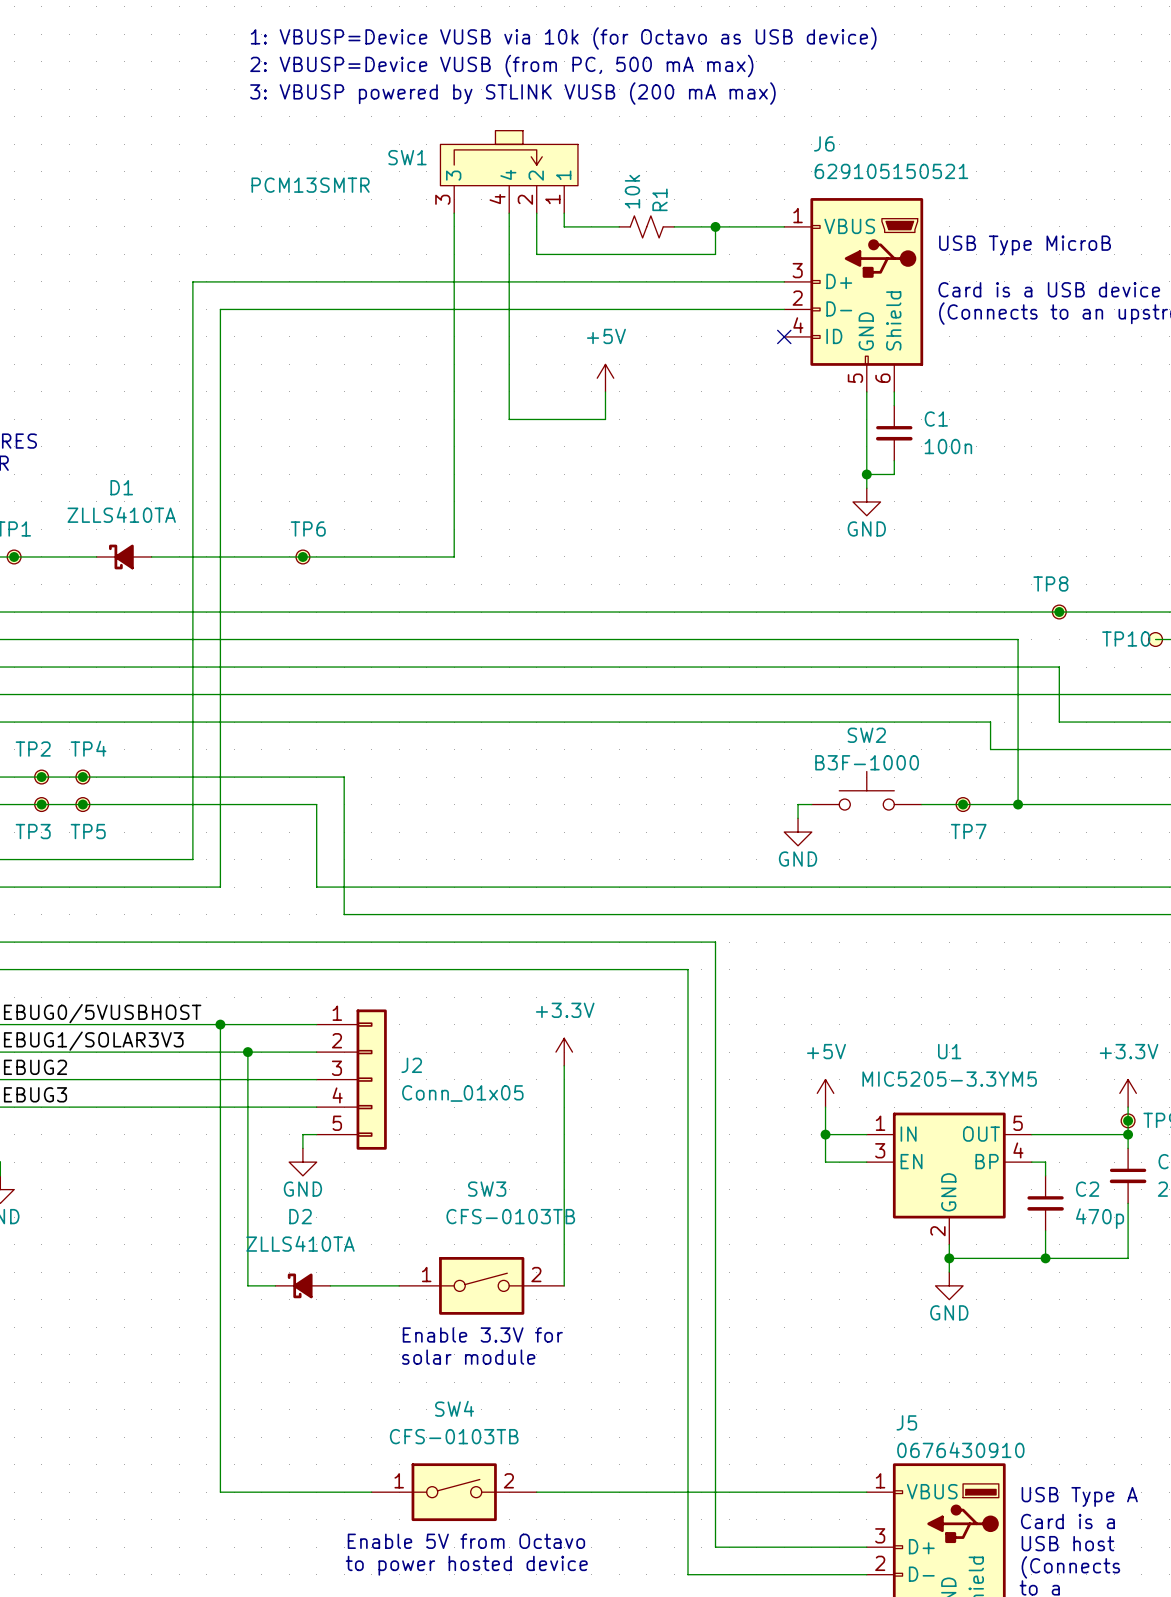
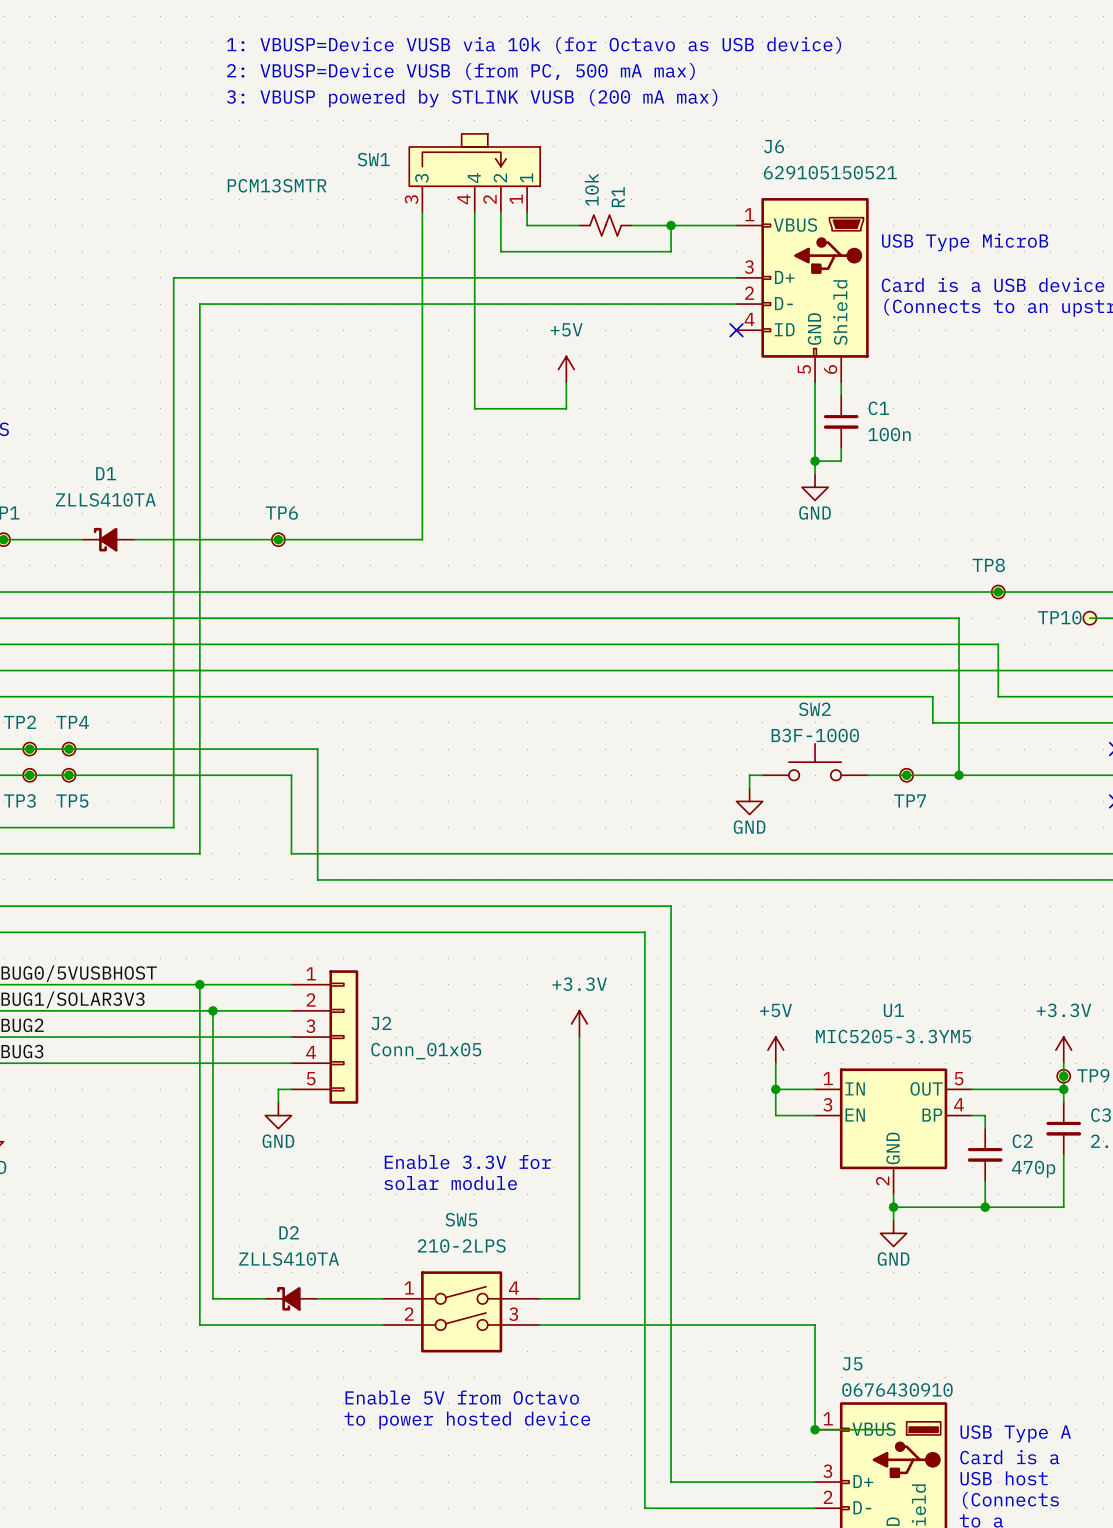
wire: none -> (212, 1010) (212, 1298) (265, 1298)
wire: (247, 1052) (247, 1285) (275, 1285) -> none
junction position: (247, 1052) -> (212, 1010)
power symbol position: +3.3V (564, 1052) -> +3.3V (579, 1023)
wire: (564, 1065) (564, 1285) -> none
wire: none -> (579, 1037) (579, 1298) (540, 1298)
D2 position: (302, 1285) -> (291, 1298)
wire: (330, 1285) (399, 1285) -> (317, 1298) (383, 1298)
SW3: CFS-0103TB (481, 1285) -> none
text position: Enable 3.3V for (482, 1334) -> Enable 3.3V for (467, 1162)
text position: solar module (468, 1357) -> solar module (450, 1183)
SW5: none -> 210-2LPS (461, 1311)
wire: (220, 1382) (220, 1492) (371, 1492) -> (199, 1324) (383, 1324)
wire: none -> (540, 1324) (815, 1324) (815, 1429) (893, 1429)
SW4: CFS-0103TB (454, 1492) -> none
wire: (536, 1492) (866, 1492) -> none
junction: none -> (815, 1429)
text position: Enable 5V from Octavo (466, 1541) -> Enable 5V from Octavo (462, 1397)
text position: to power hosted device (466, 1565) -> to power hosted device (467, 1420)

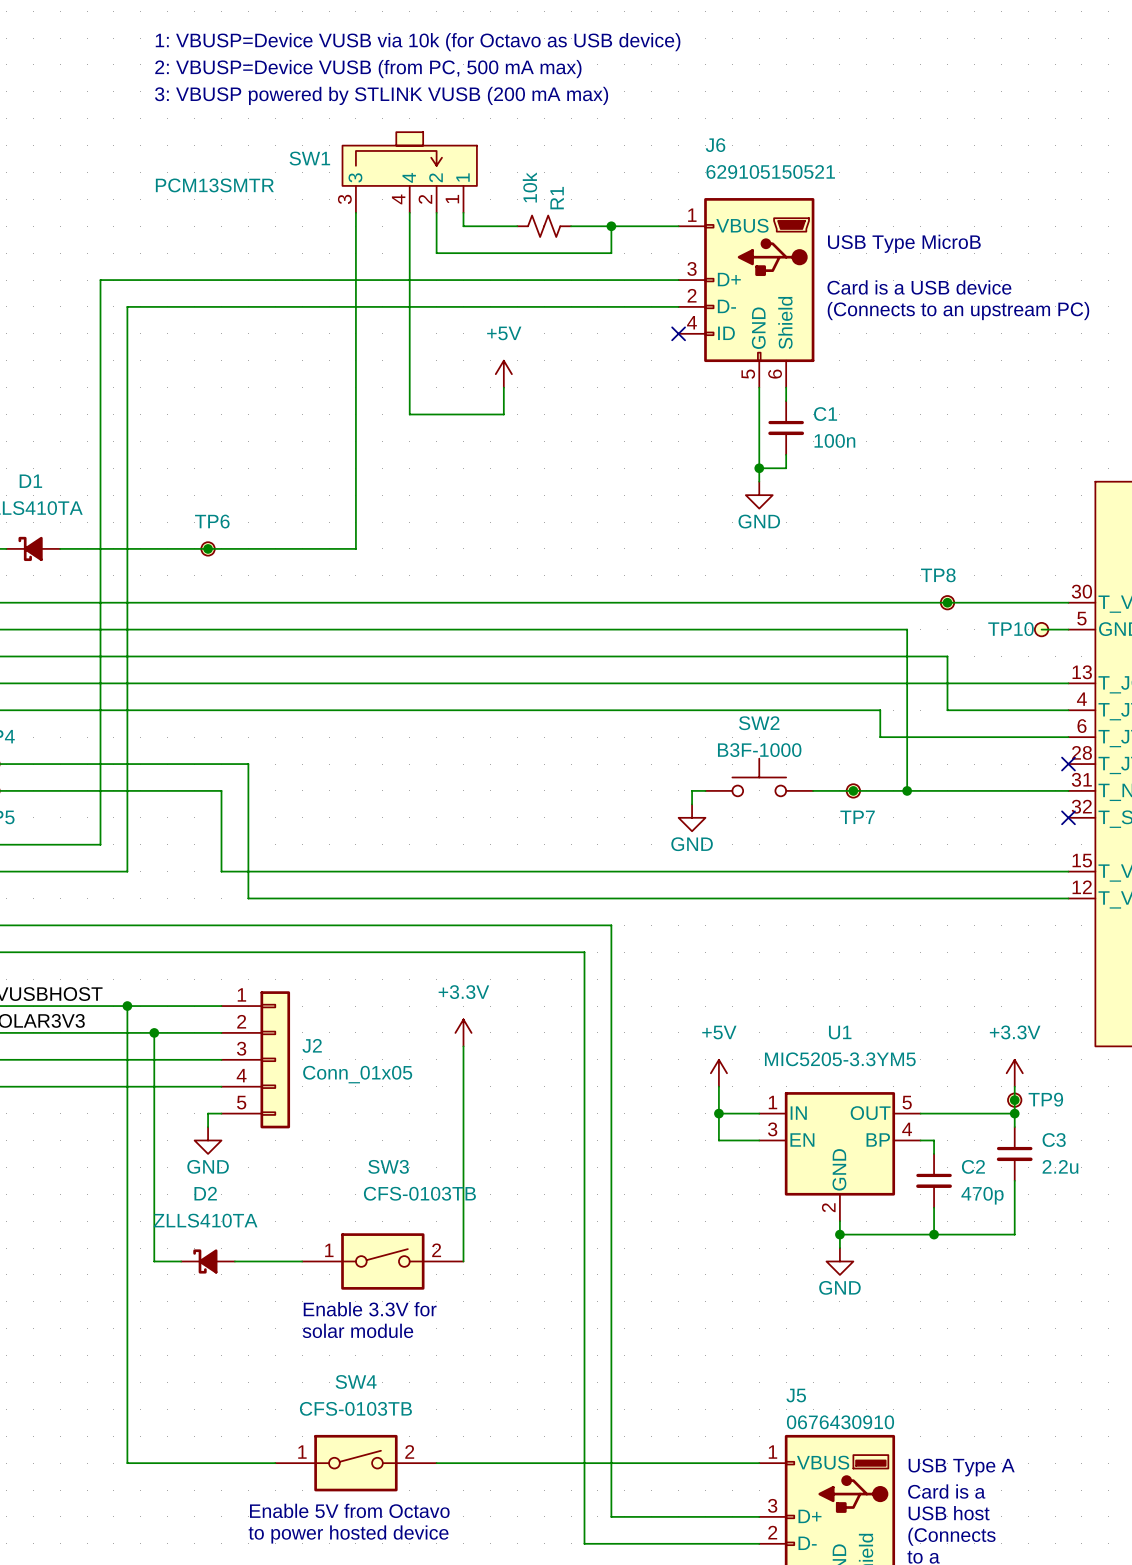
wire: (212, 1010) (212, 1298) (265, 1298) -> none
junction position: (212, 1010) -> (154, 1032)
wire: none -> (154, 1032) (154, 1261) (181, 1261)
wire: none -> (463, 1046) (463, 1261)
power symbol position: +3.3V (579, 1023) -> +3.3V (463, 1032)
wire: (579, 1037) (579, 1298) (540, 1298) -> none
text position: Enable 3.3V for (467, 1162) -> Enable 3.3V for (370, 1309)
text position: solar module (450, 1183) -> solar module (357, 1330)
SW3: none -> CFS-0103TB (382, 1261)
D2 position: (291, 1298) -> (208, 1261)
wire: (317, 1298) (383, 1298) -> (234, 1261) (302, 1261)
SW5: 210-2LPS (461, 1311) -> none
wire: (199, 1324) (383, 1324) -> (127, 1355) (127, 1463) (275, 1463)
wire: (540, 1324) (815, 1324) (815, 1429) (893, 1429) -> none
text position: Enable 5V from Octavo (462, 1397) -> Enable 5V from Octavo (349, 1510)
text position: to power hosted device (467, 1420) -> to power hosted device (348, 1534)
SW4: none -> CFS-0103TB (355, 1463)
wire: none -> (436, 1463) (759, 1463)
junction: (815, 1429) -> none

